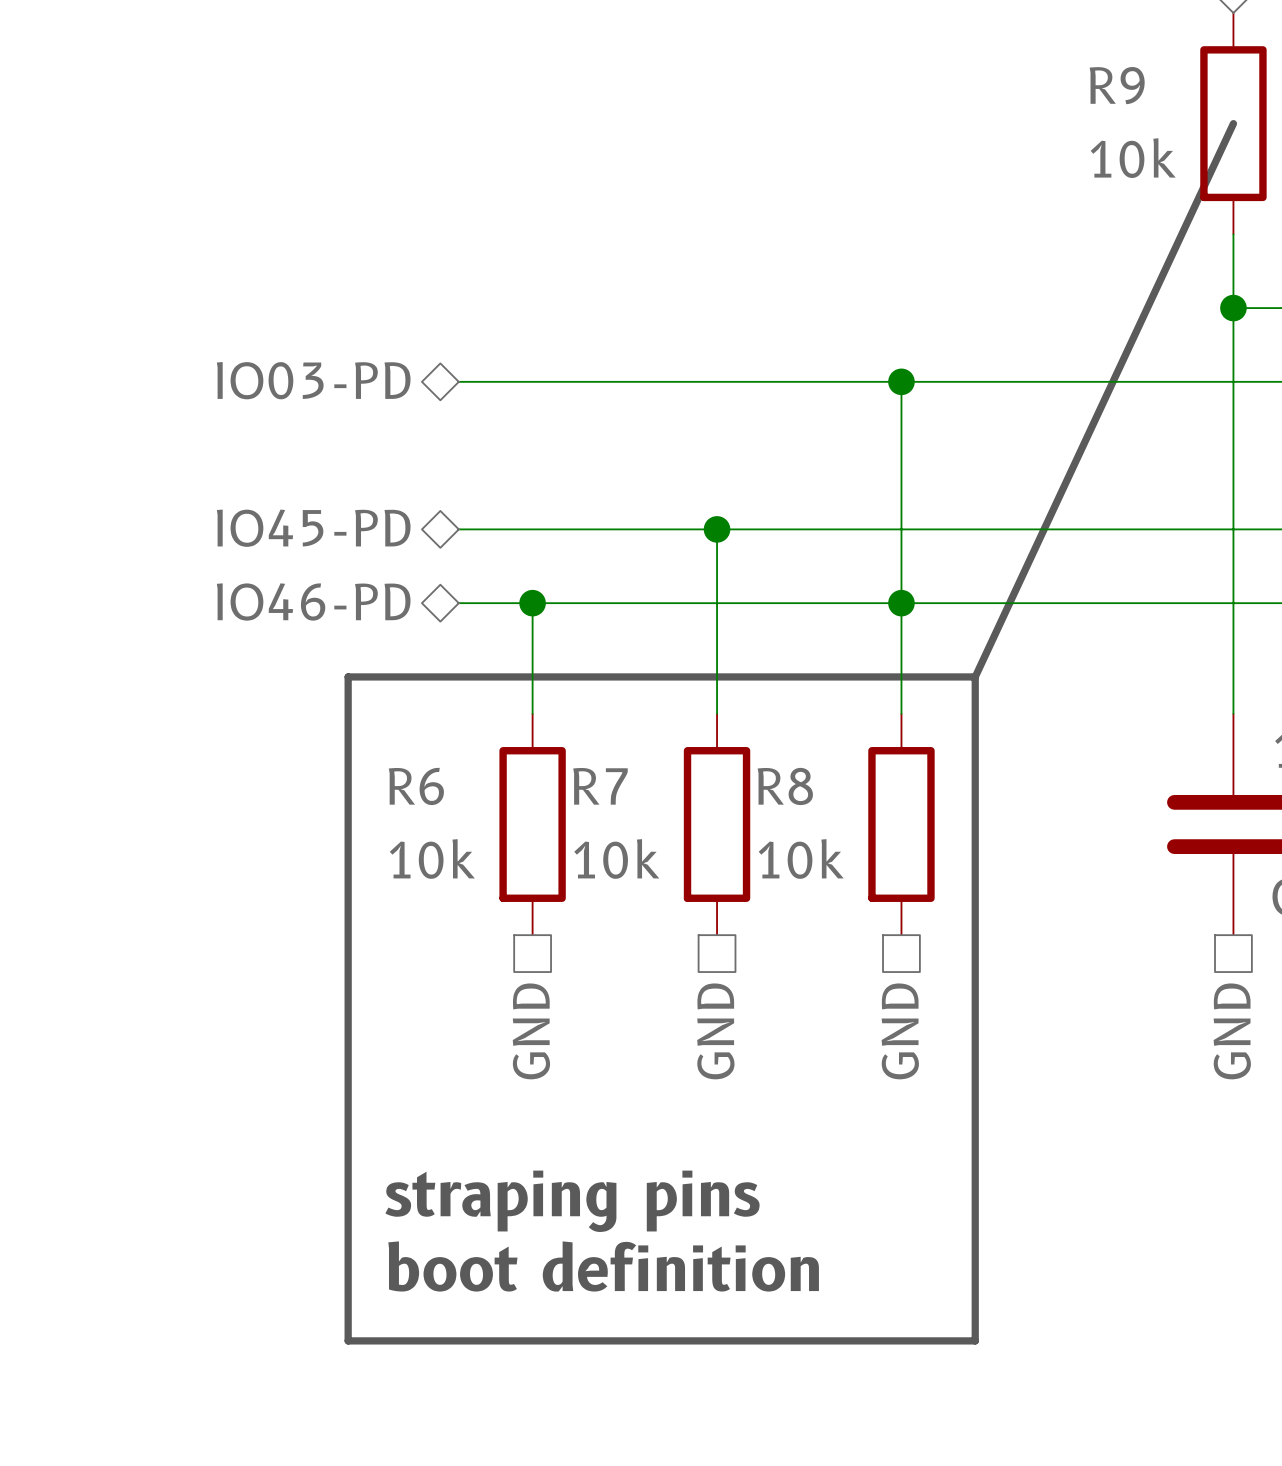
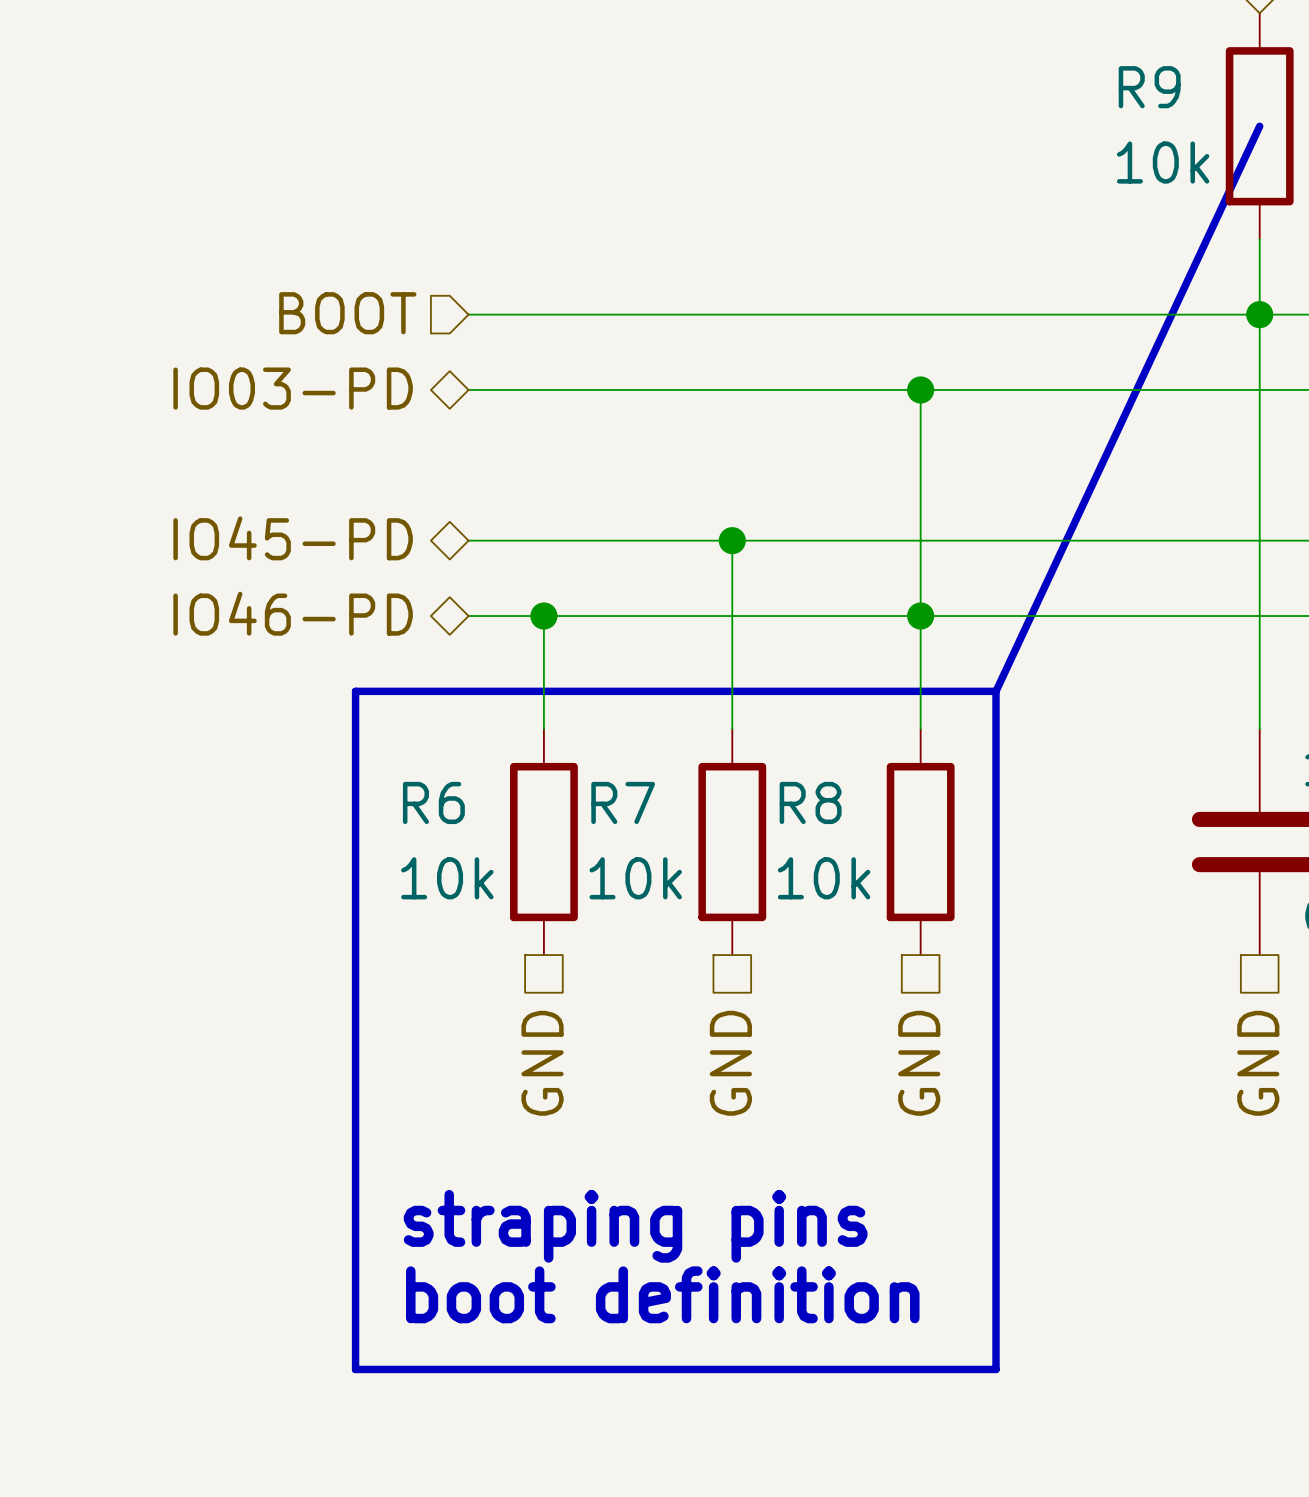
hierarchical label: none -> BOOT (347, 313)
wire: none -> (468, 314) (1259, 314)

